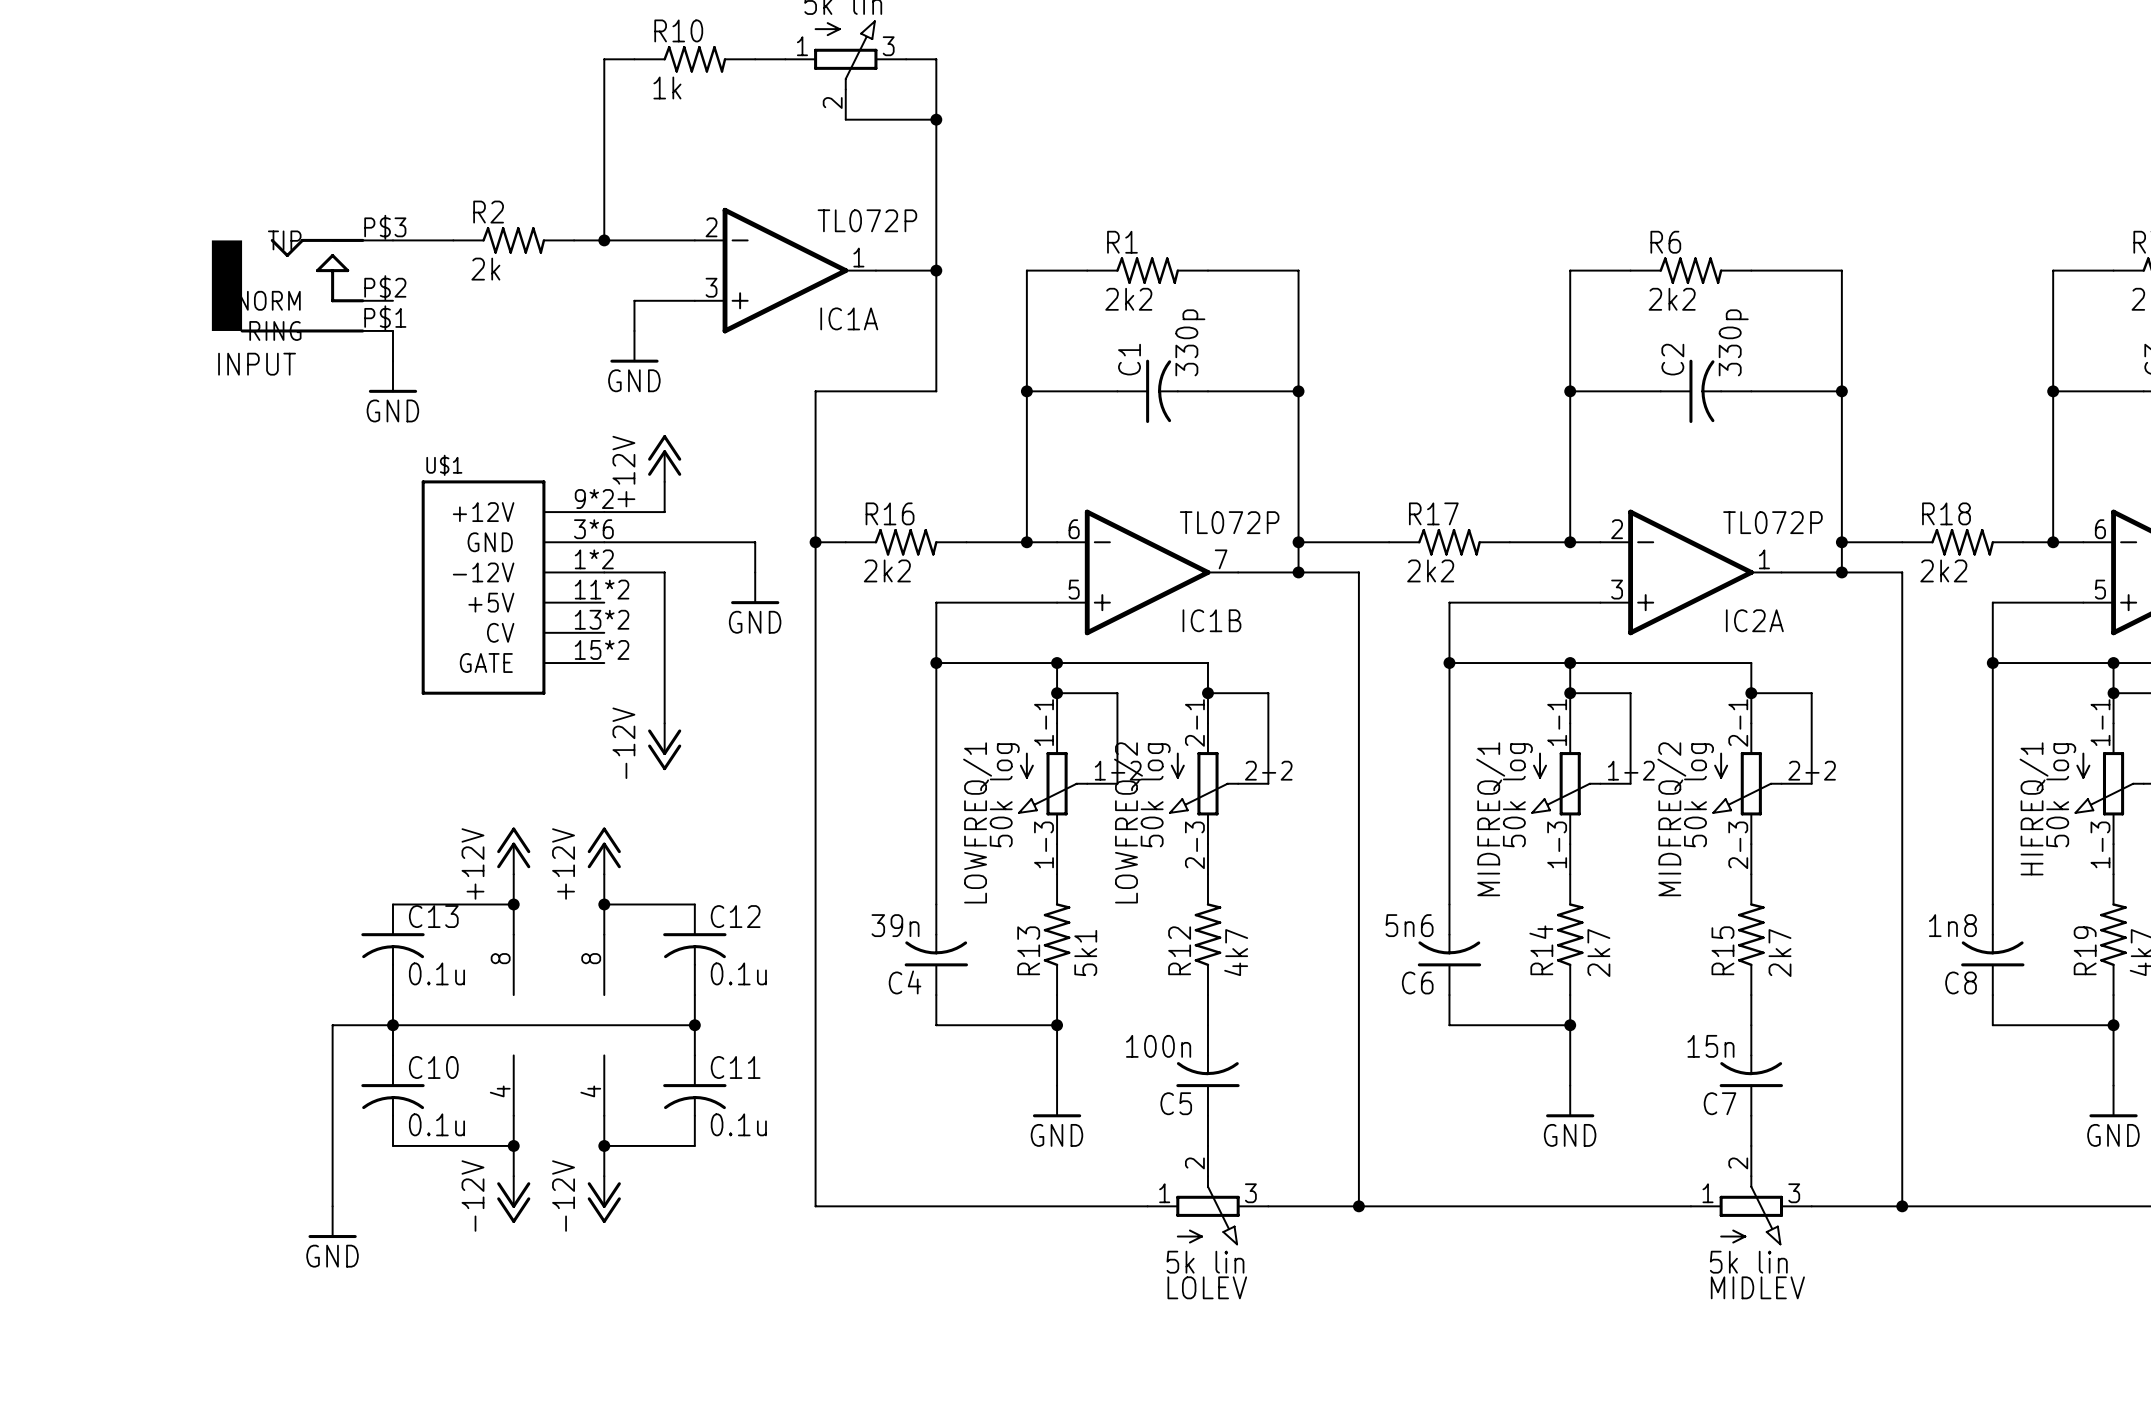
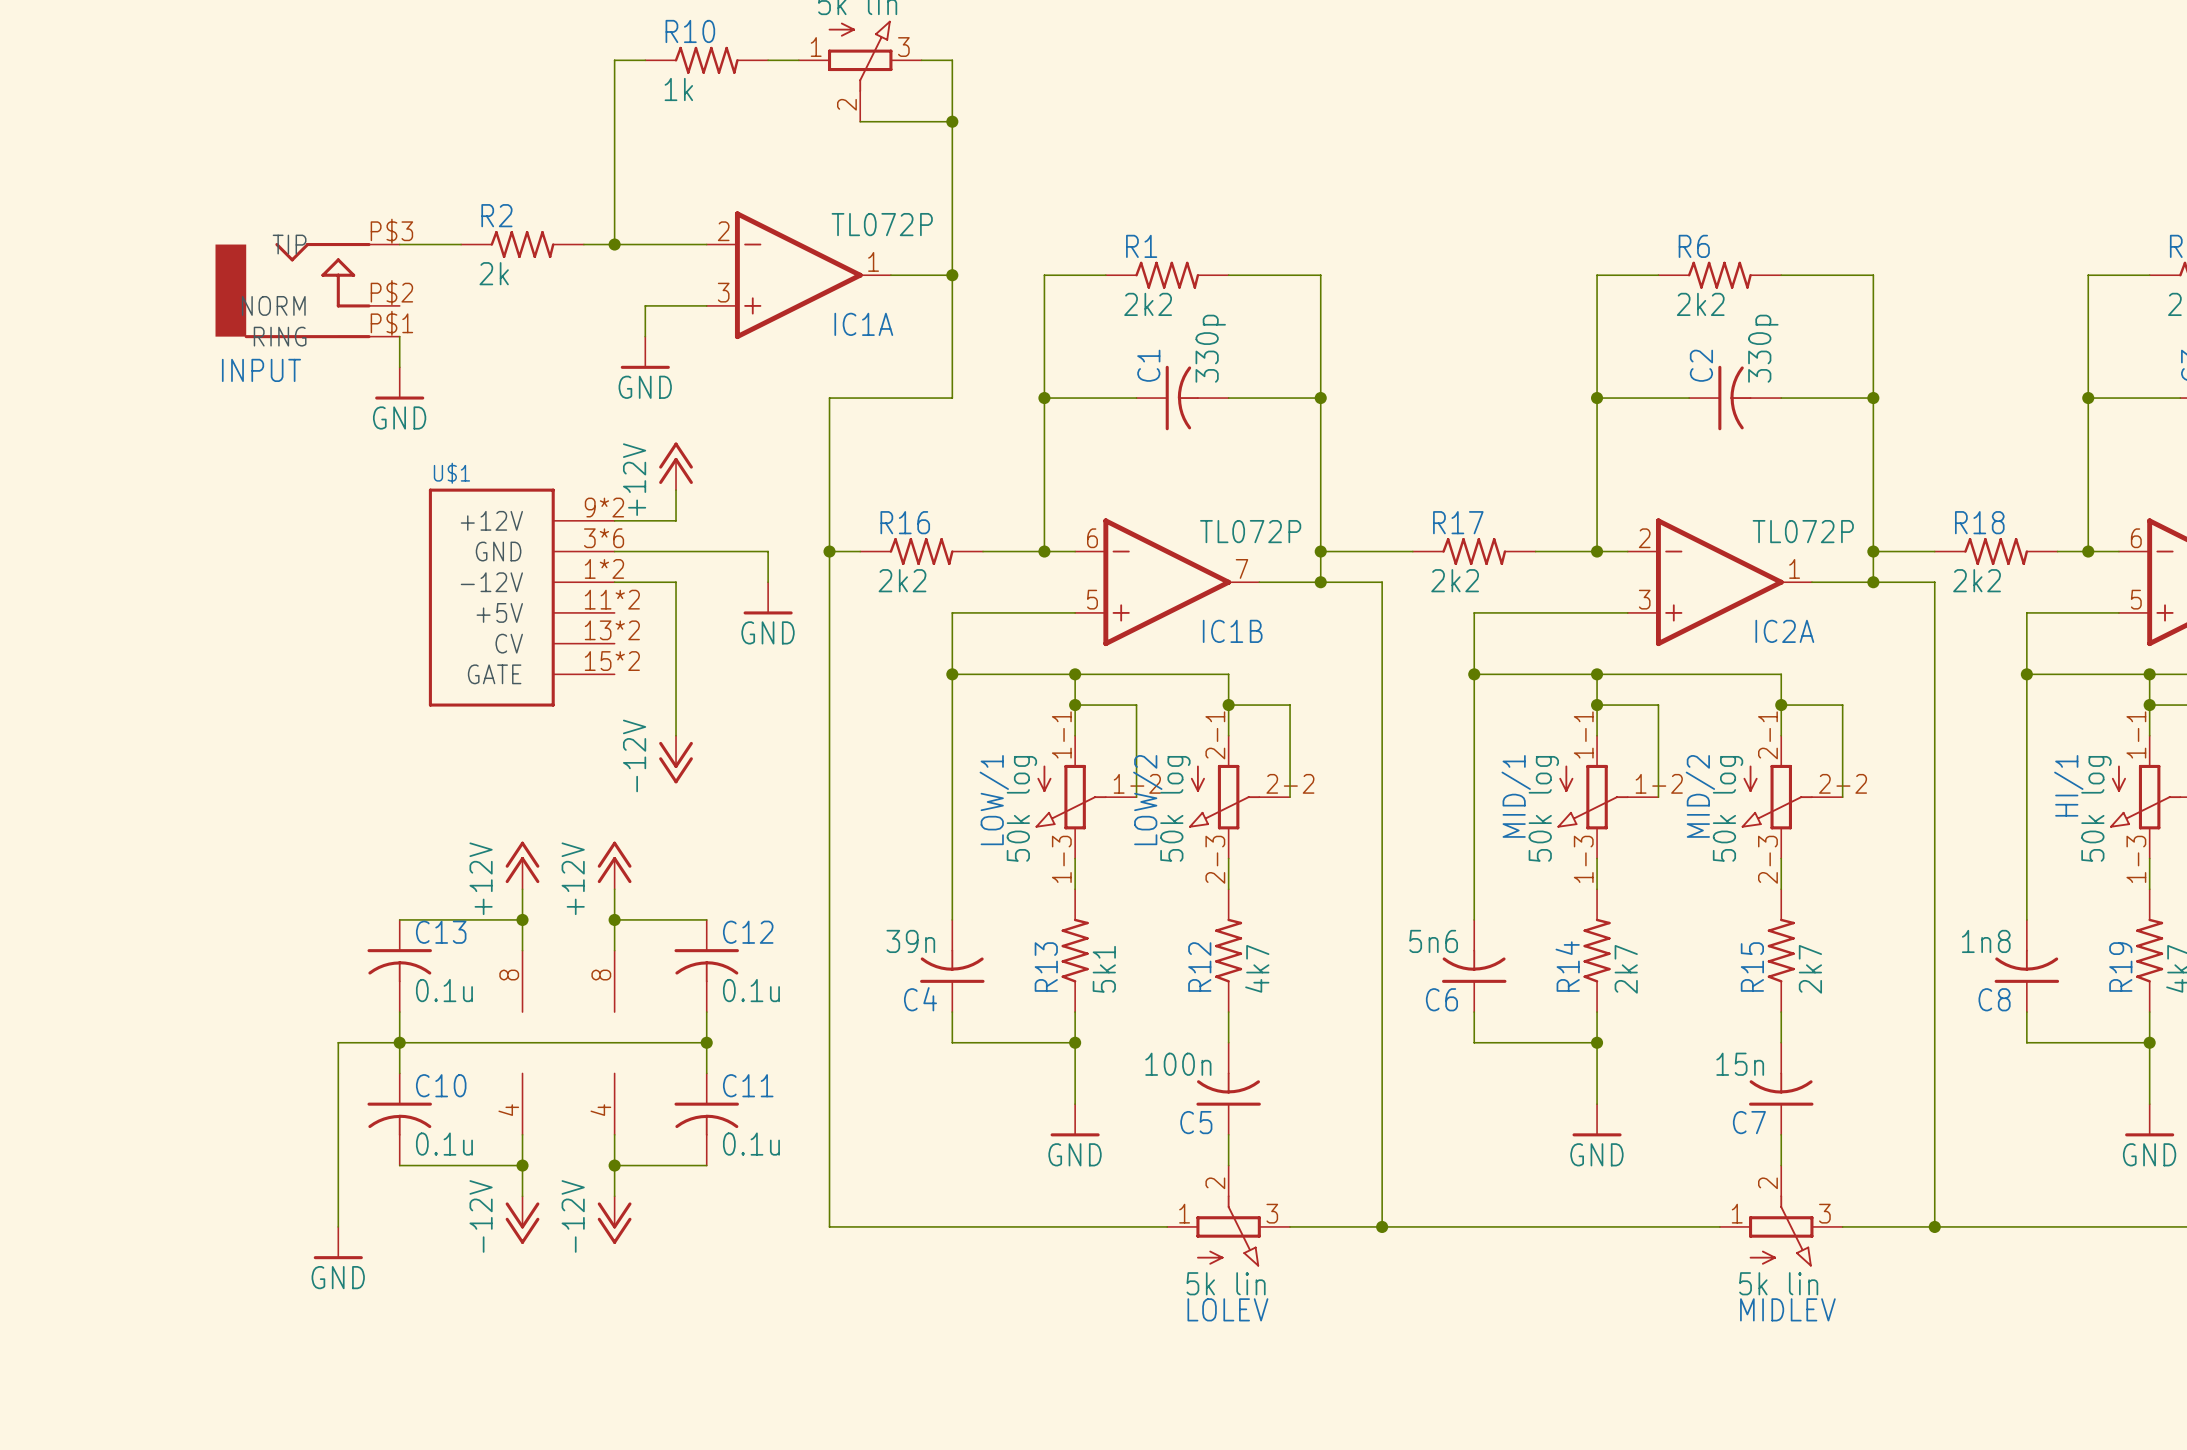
HIFREQ/1 name: HIFREQ/1 (2034, 808) -> HI/1 (2068, 785)
MIDFREQ/1 name: MIDFREQ/1 (1490, 819) -> MID/1 (1516, 796)
MIDFREQ/2 name: MIDFREQ/2 (1671, 819) -> MID/2 (1700, 796)
LOWFREQ/1 name: LOWFREQ/1 (977, 822) -> LOW/1 (994, 800)
LOWFREQ/2 name: LOWFREQ/2 (1128, 822) -> LOW/2 (1147, 800)

